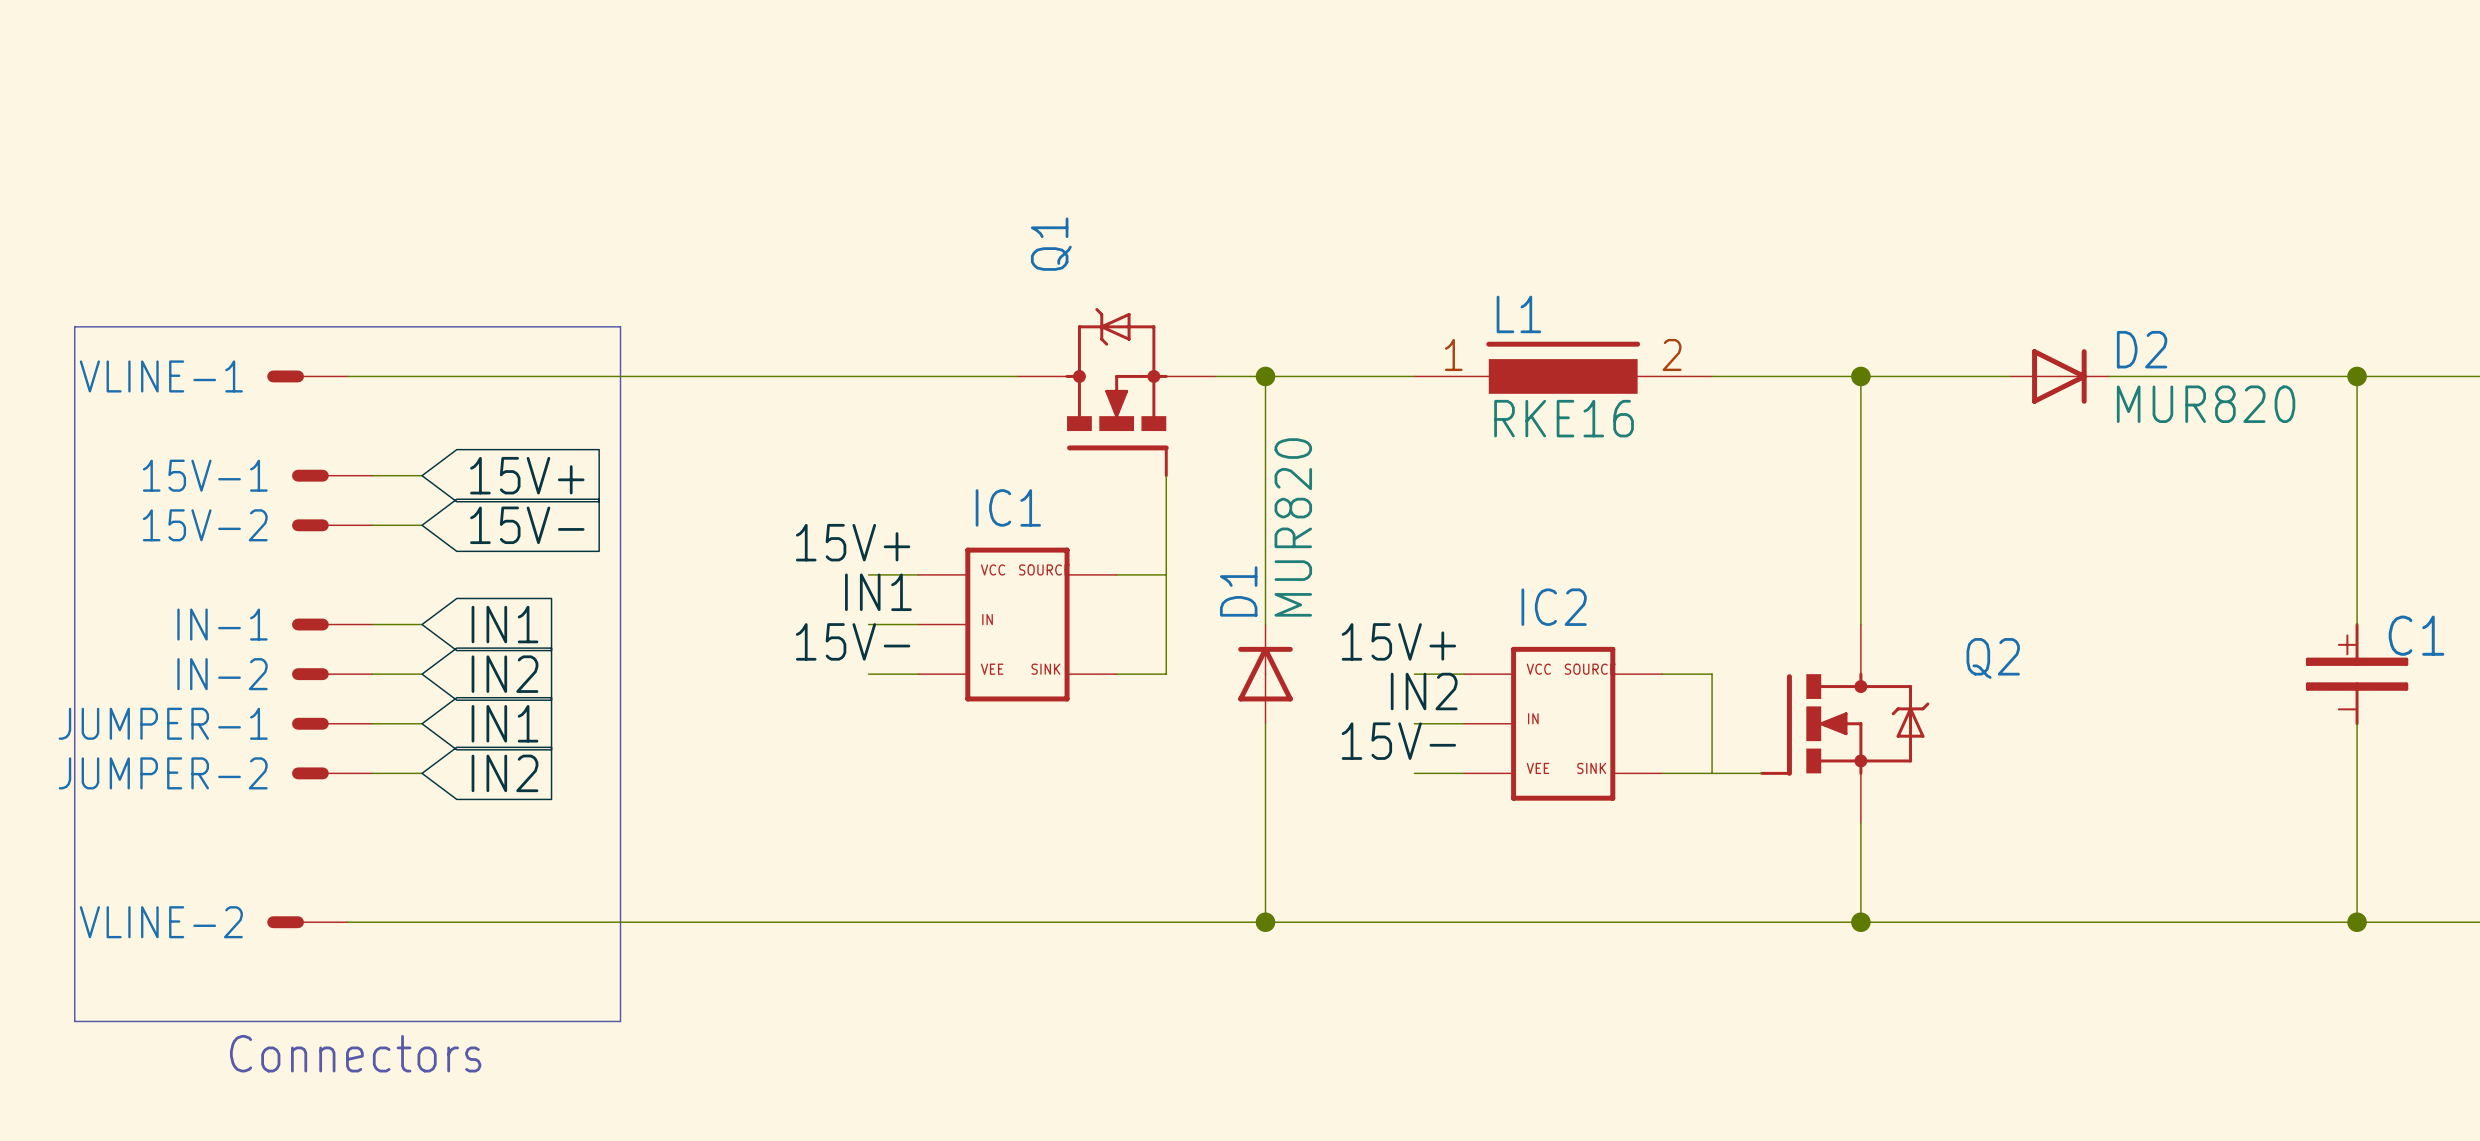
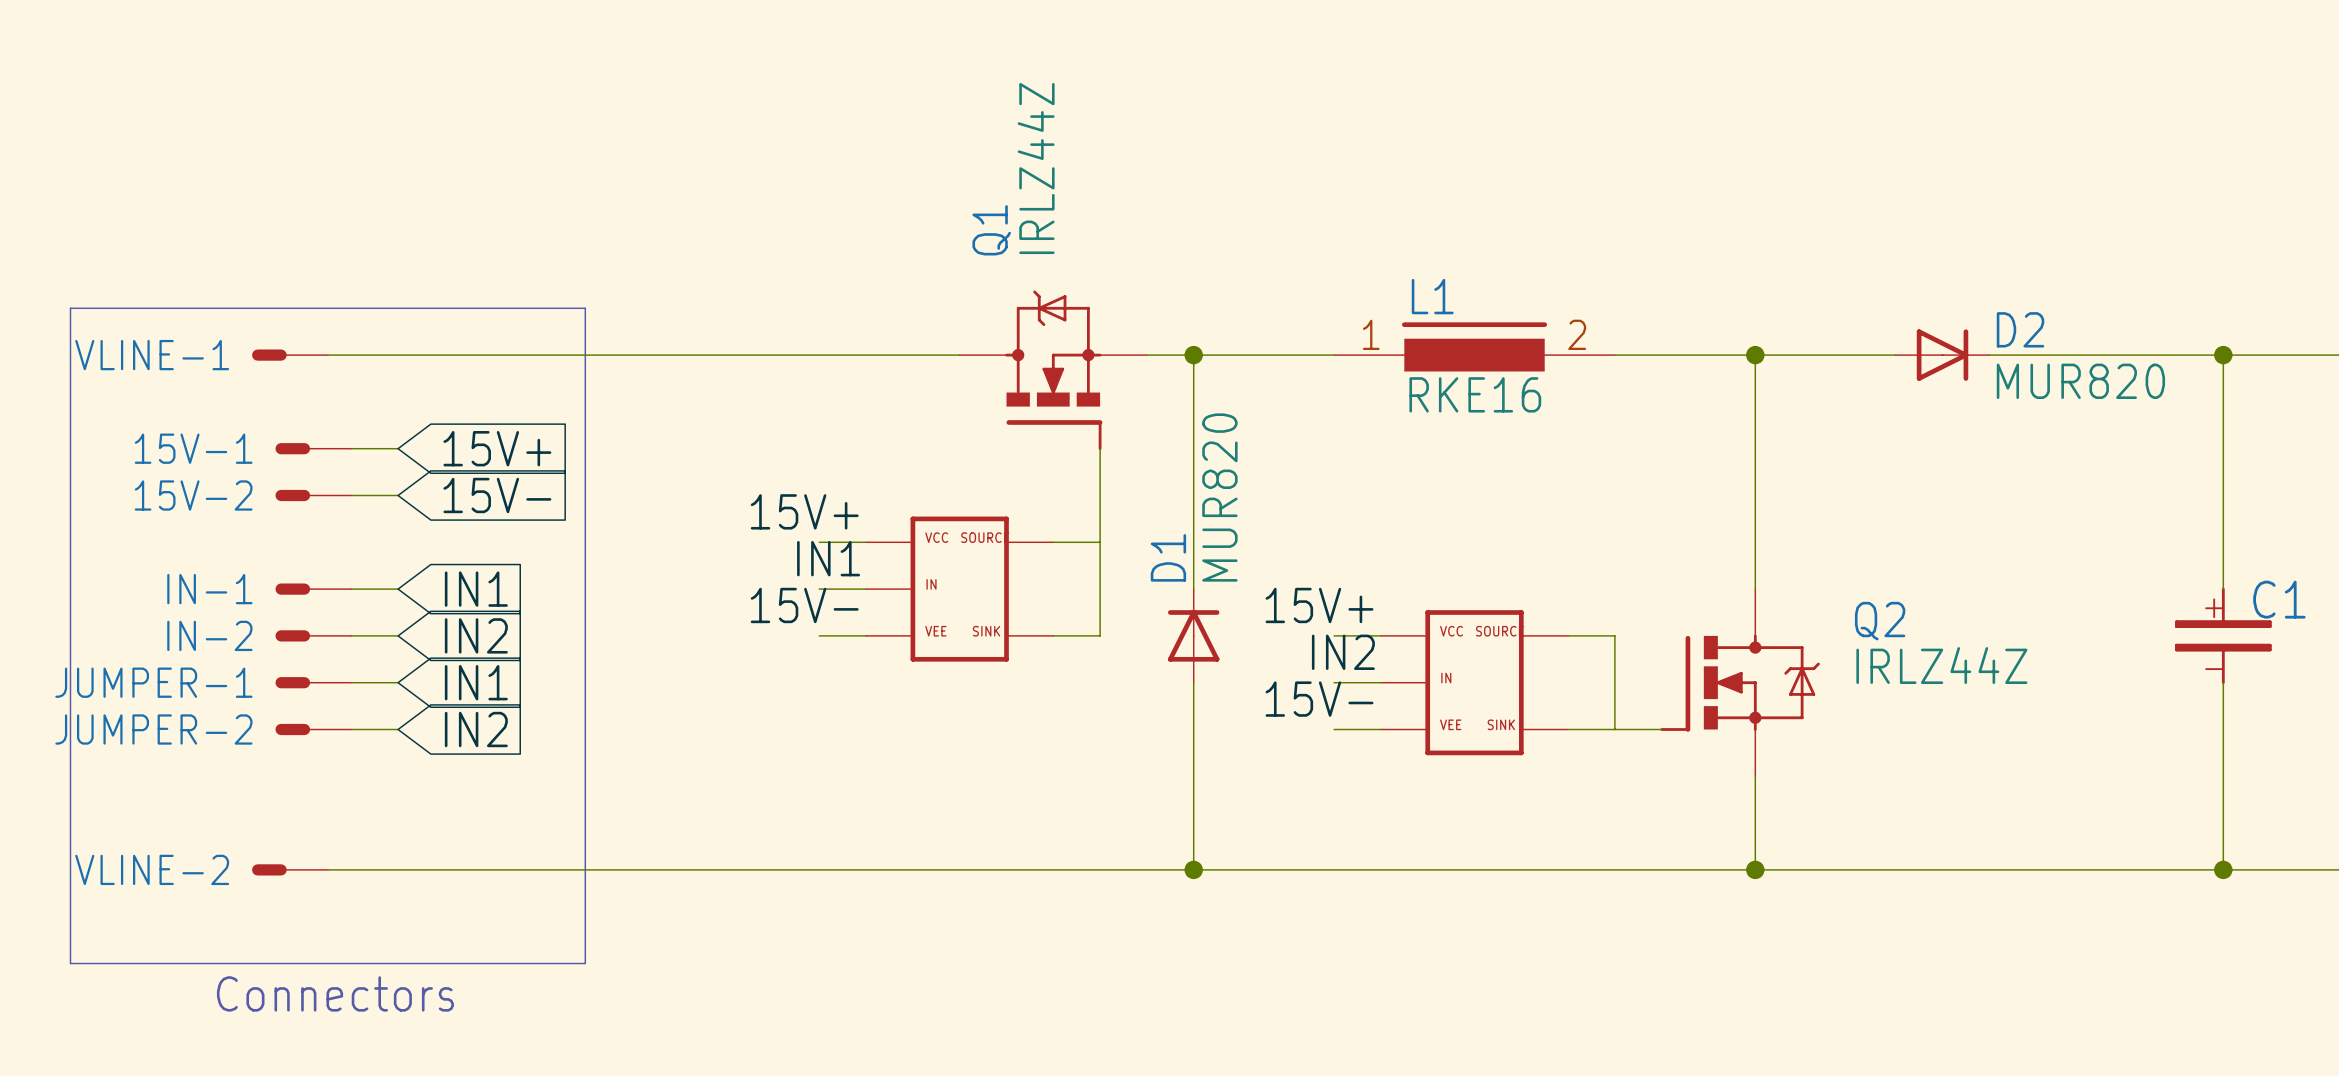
Q1 value: none -> IRLZ44Z (1036, 168)
IC1 name: IC1 (1008, 507) -> none
IC2 name: IC2 (1554, 607) -> none
Q2 value: none -> IRLZ44Z (1941, 665)

